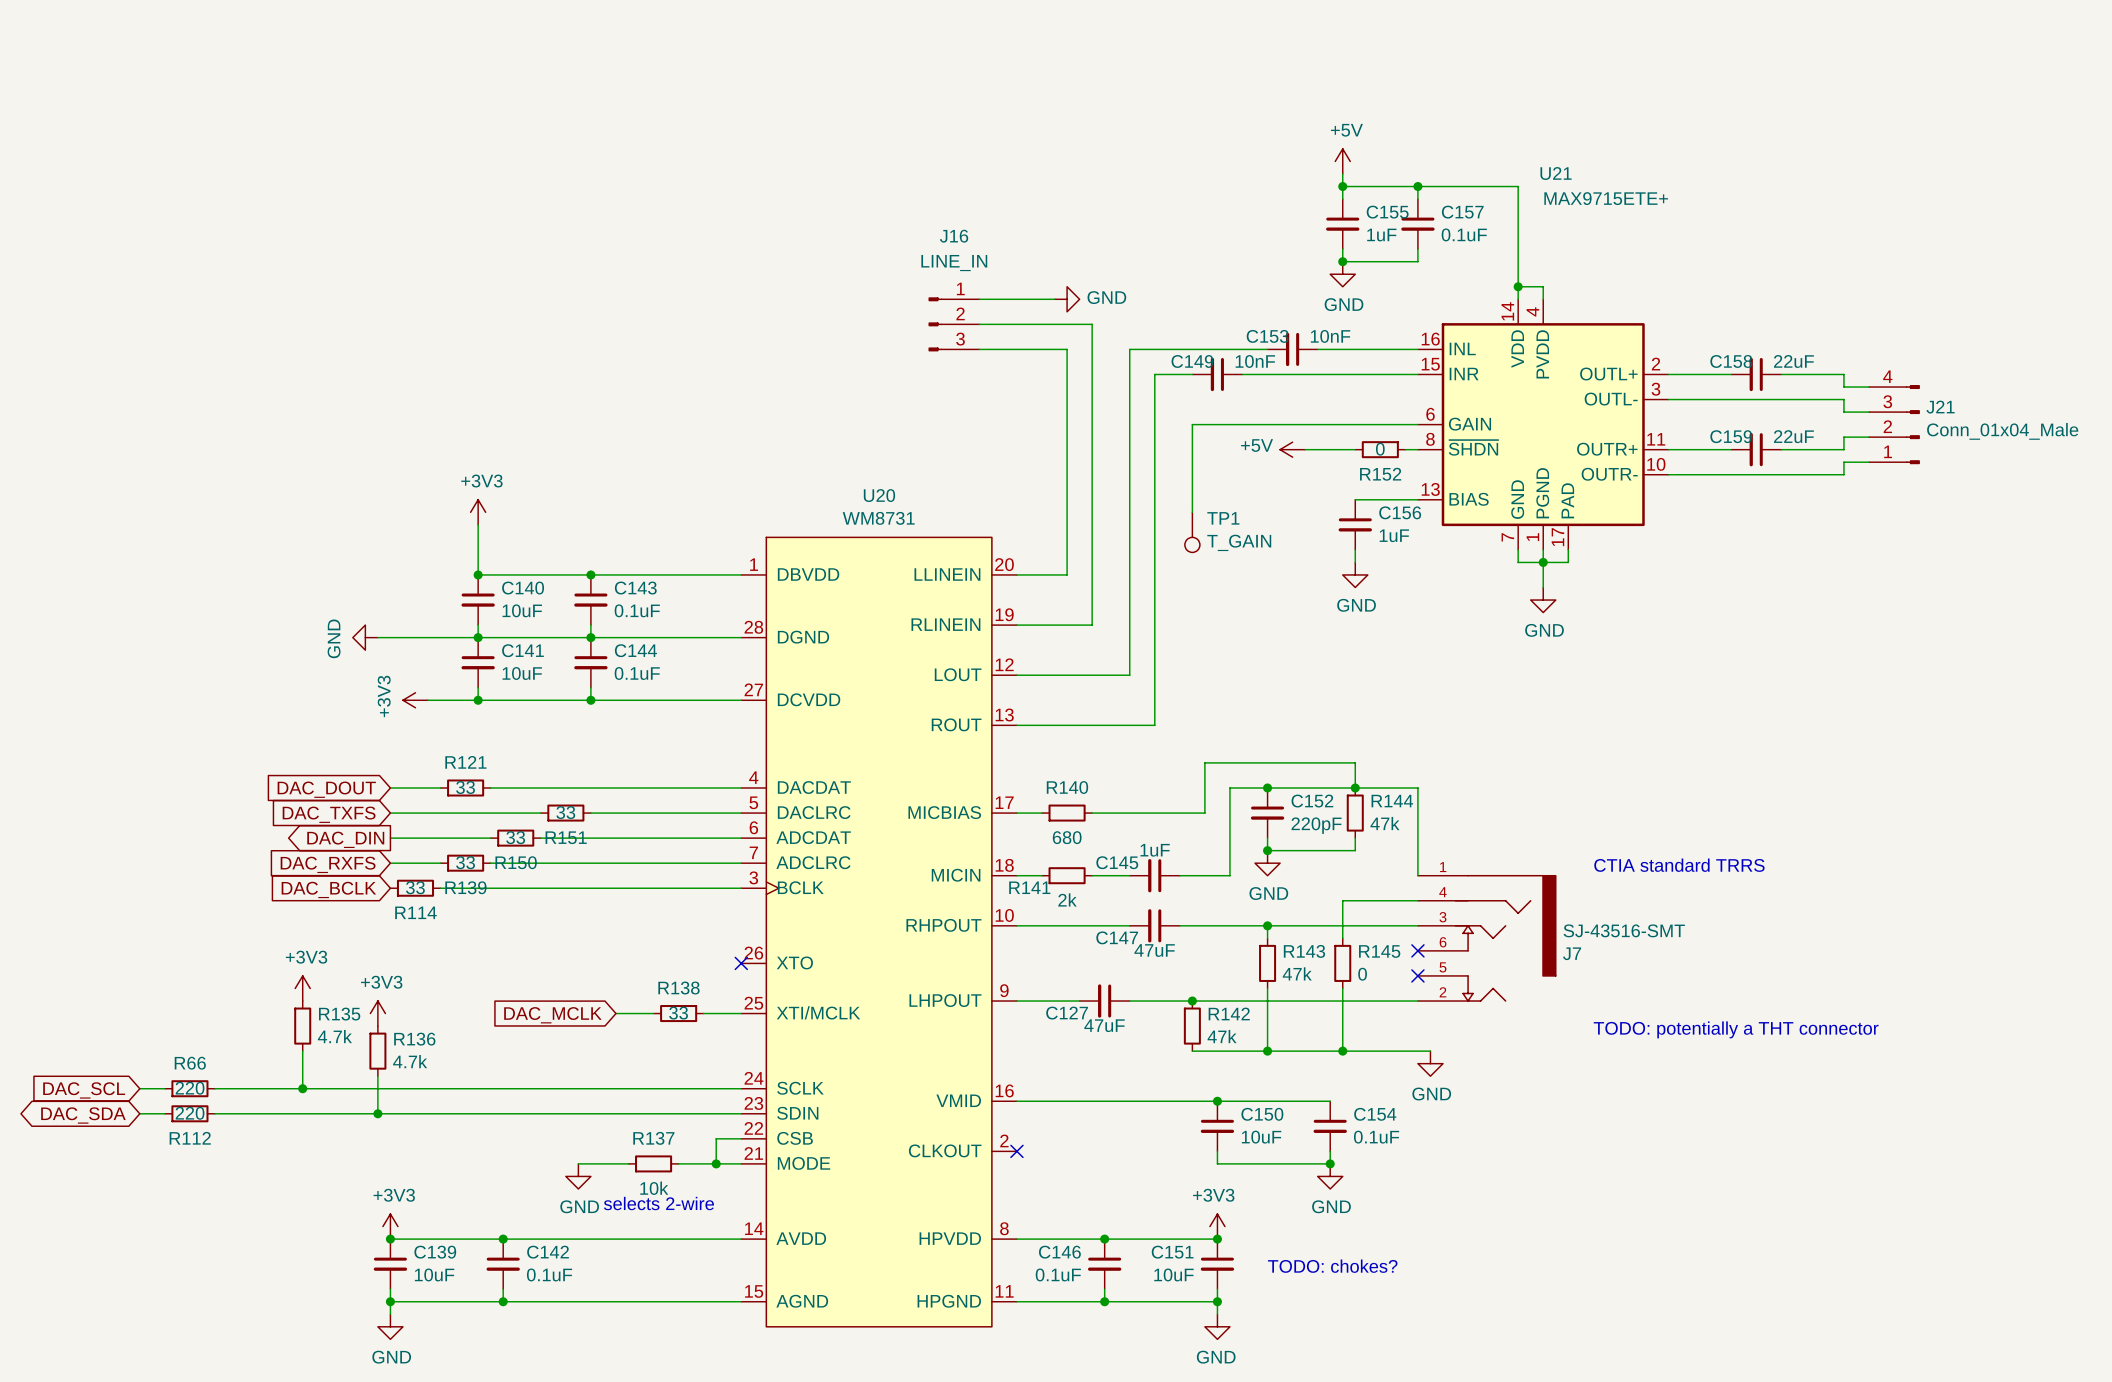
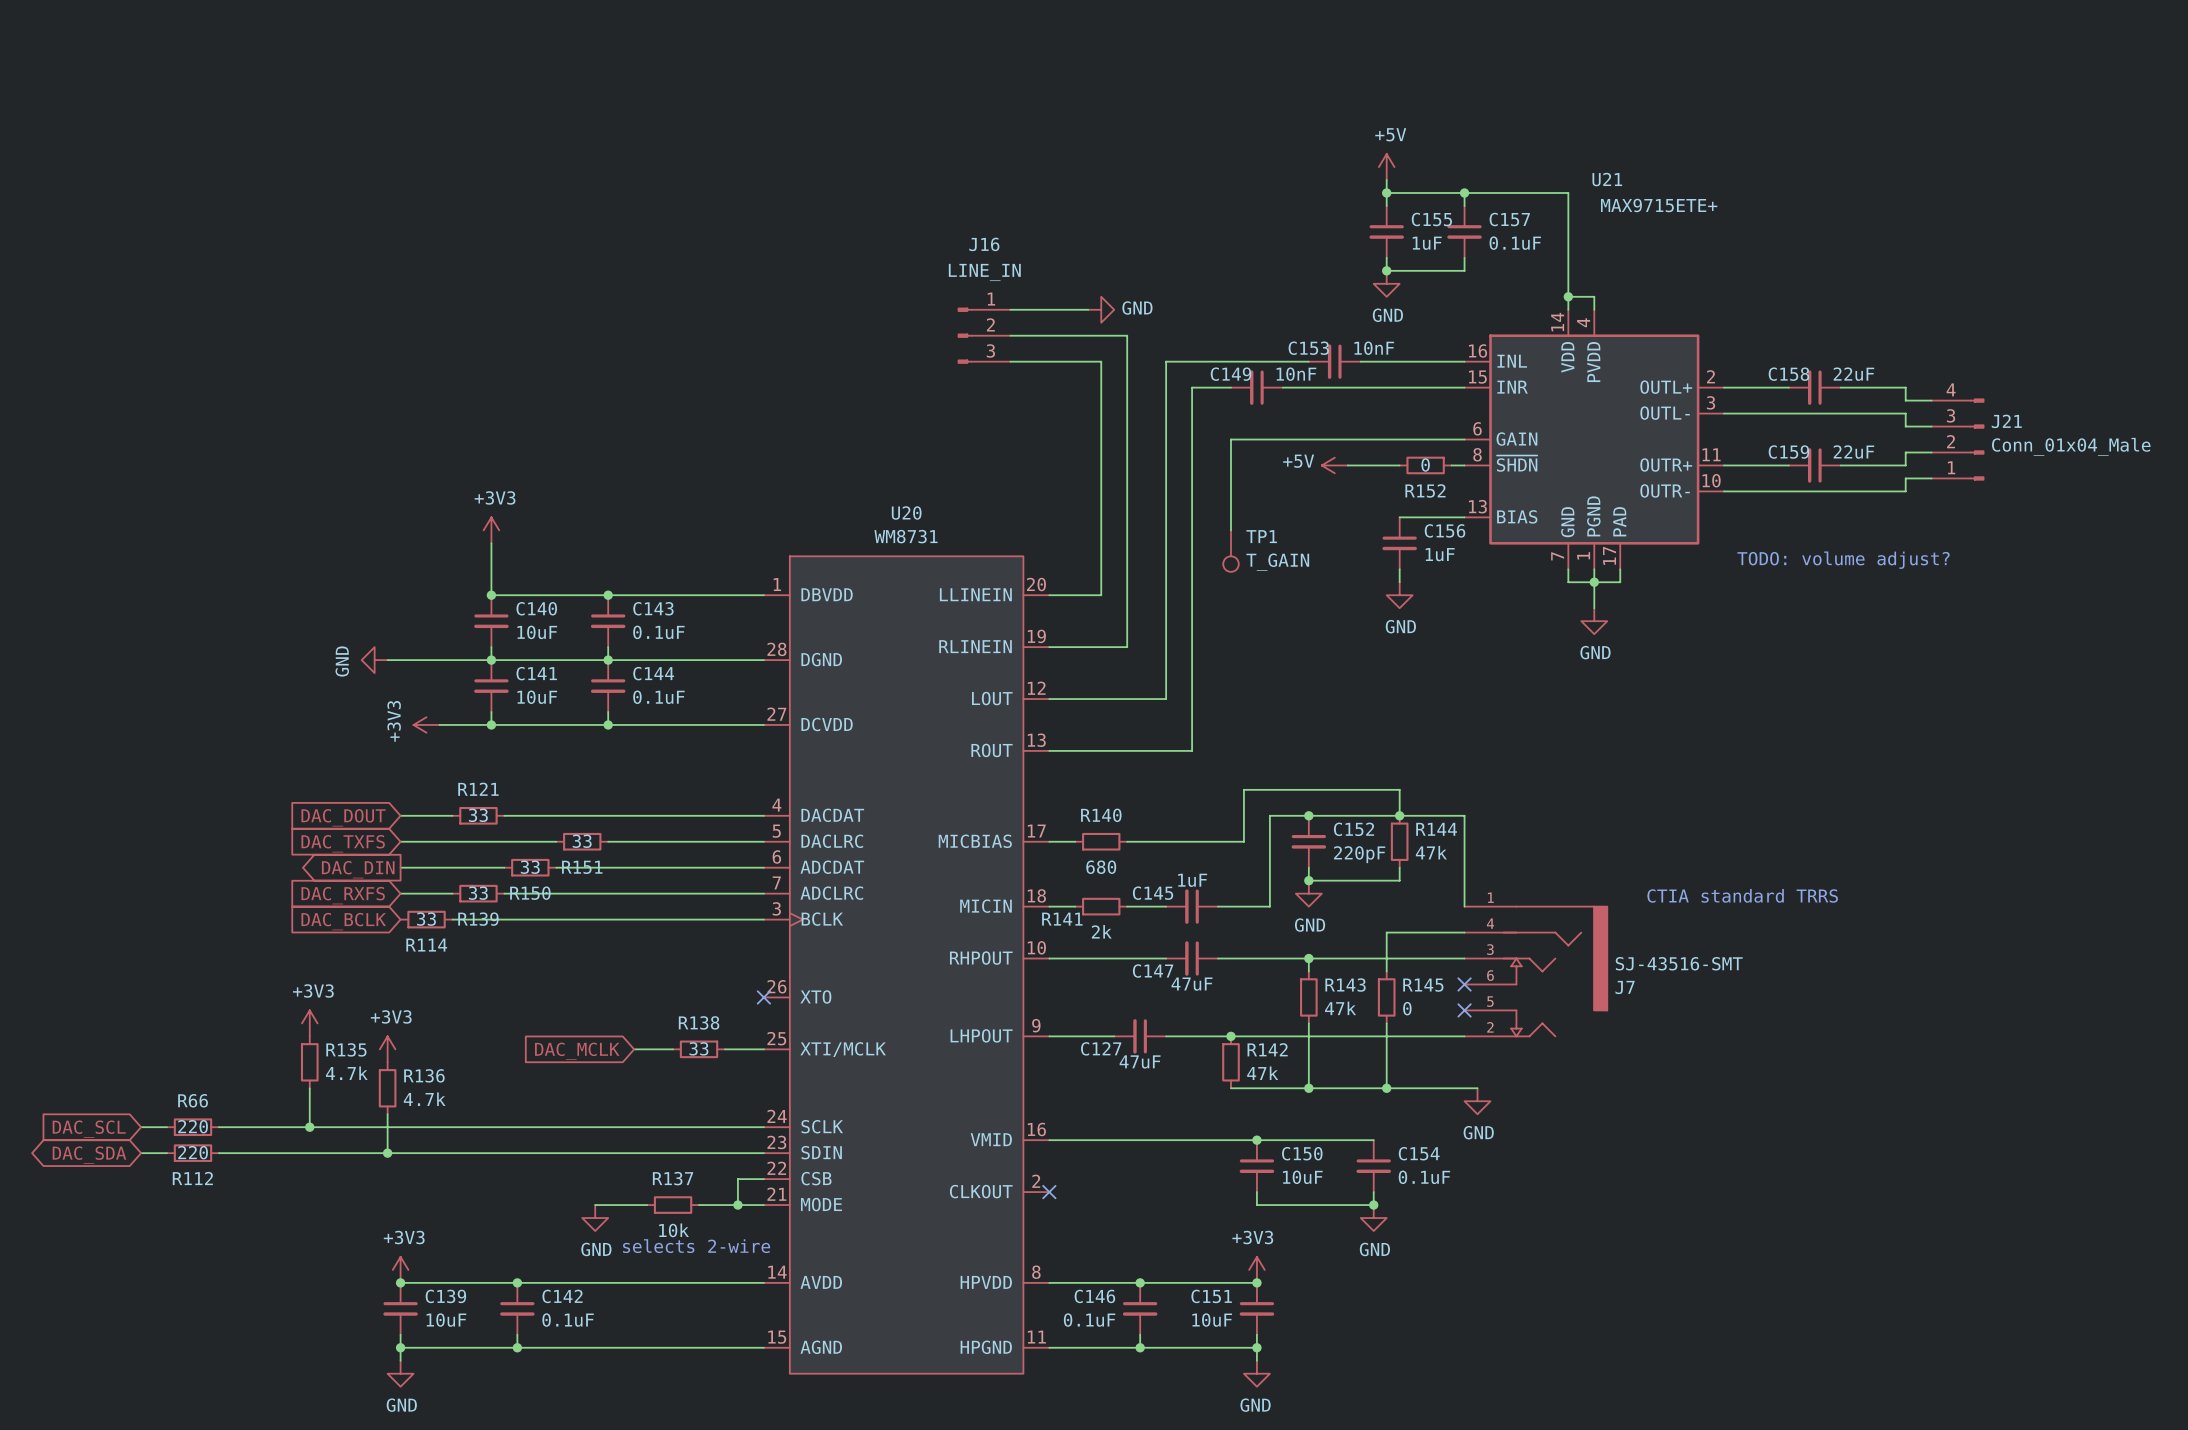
text: none -> TODO: volume adjust? (1843, 560)
text: TODO: potentially a THT connector (1736, 1029) -> none
text: TODO: chokes? (1332, 1266) -> none

